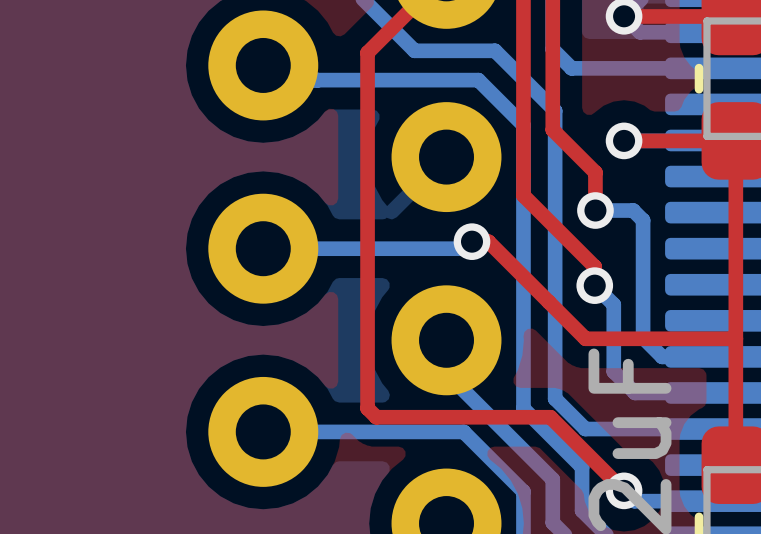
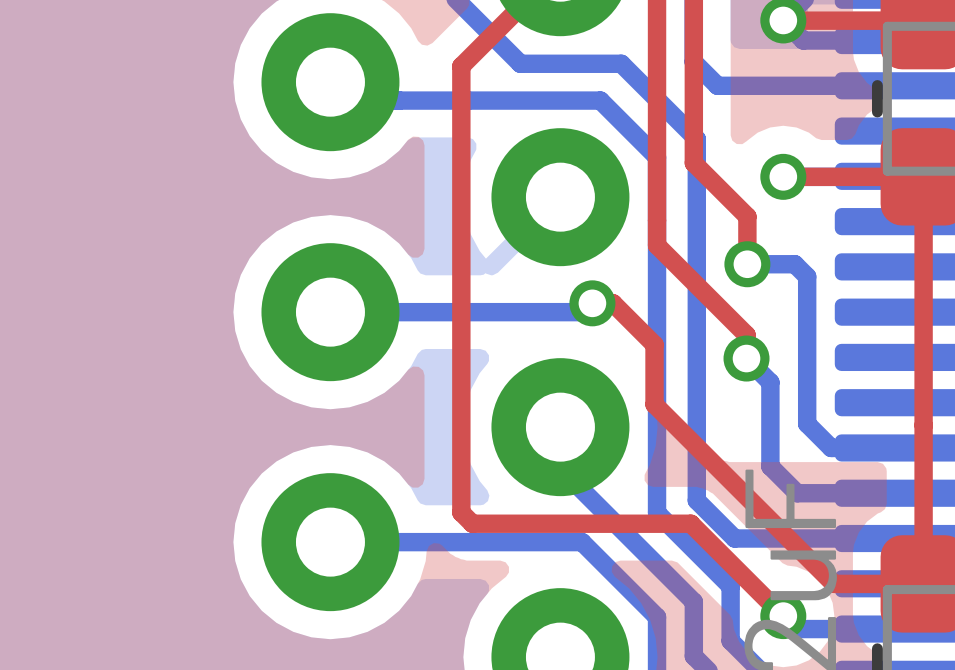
top track: (521, 274) (585, 338) (735, 338) -> (654, 344) (654, 404) (833, 583) (923, 583)

